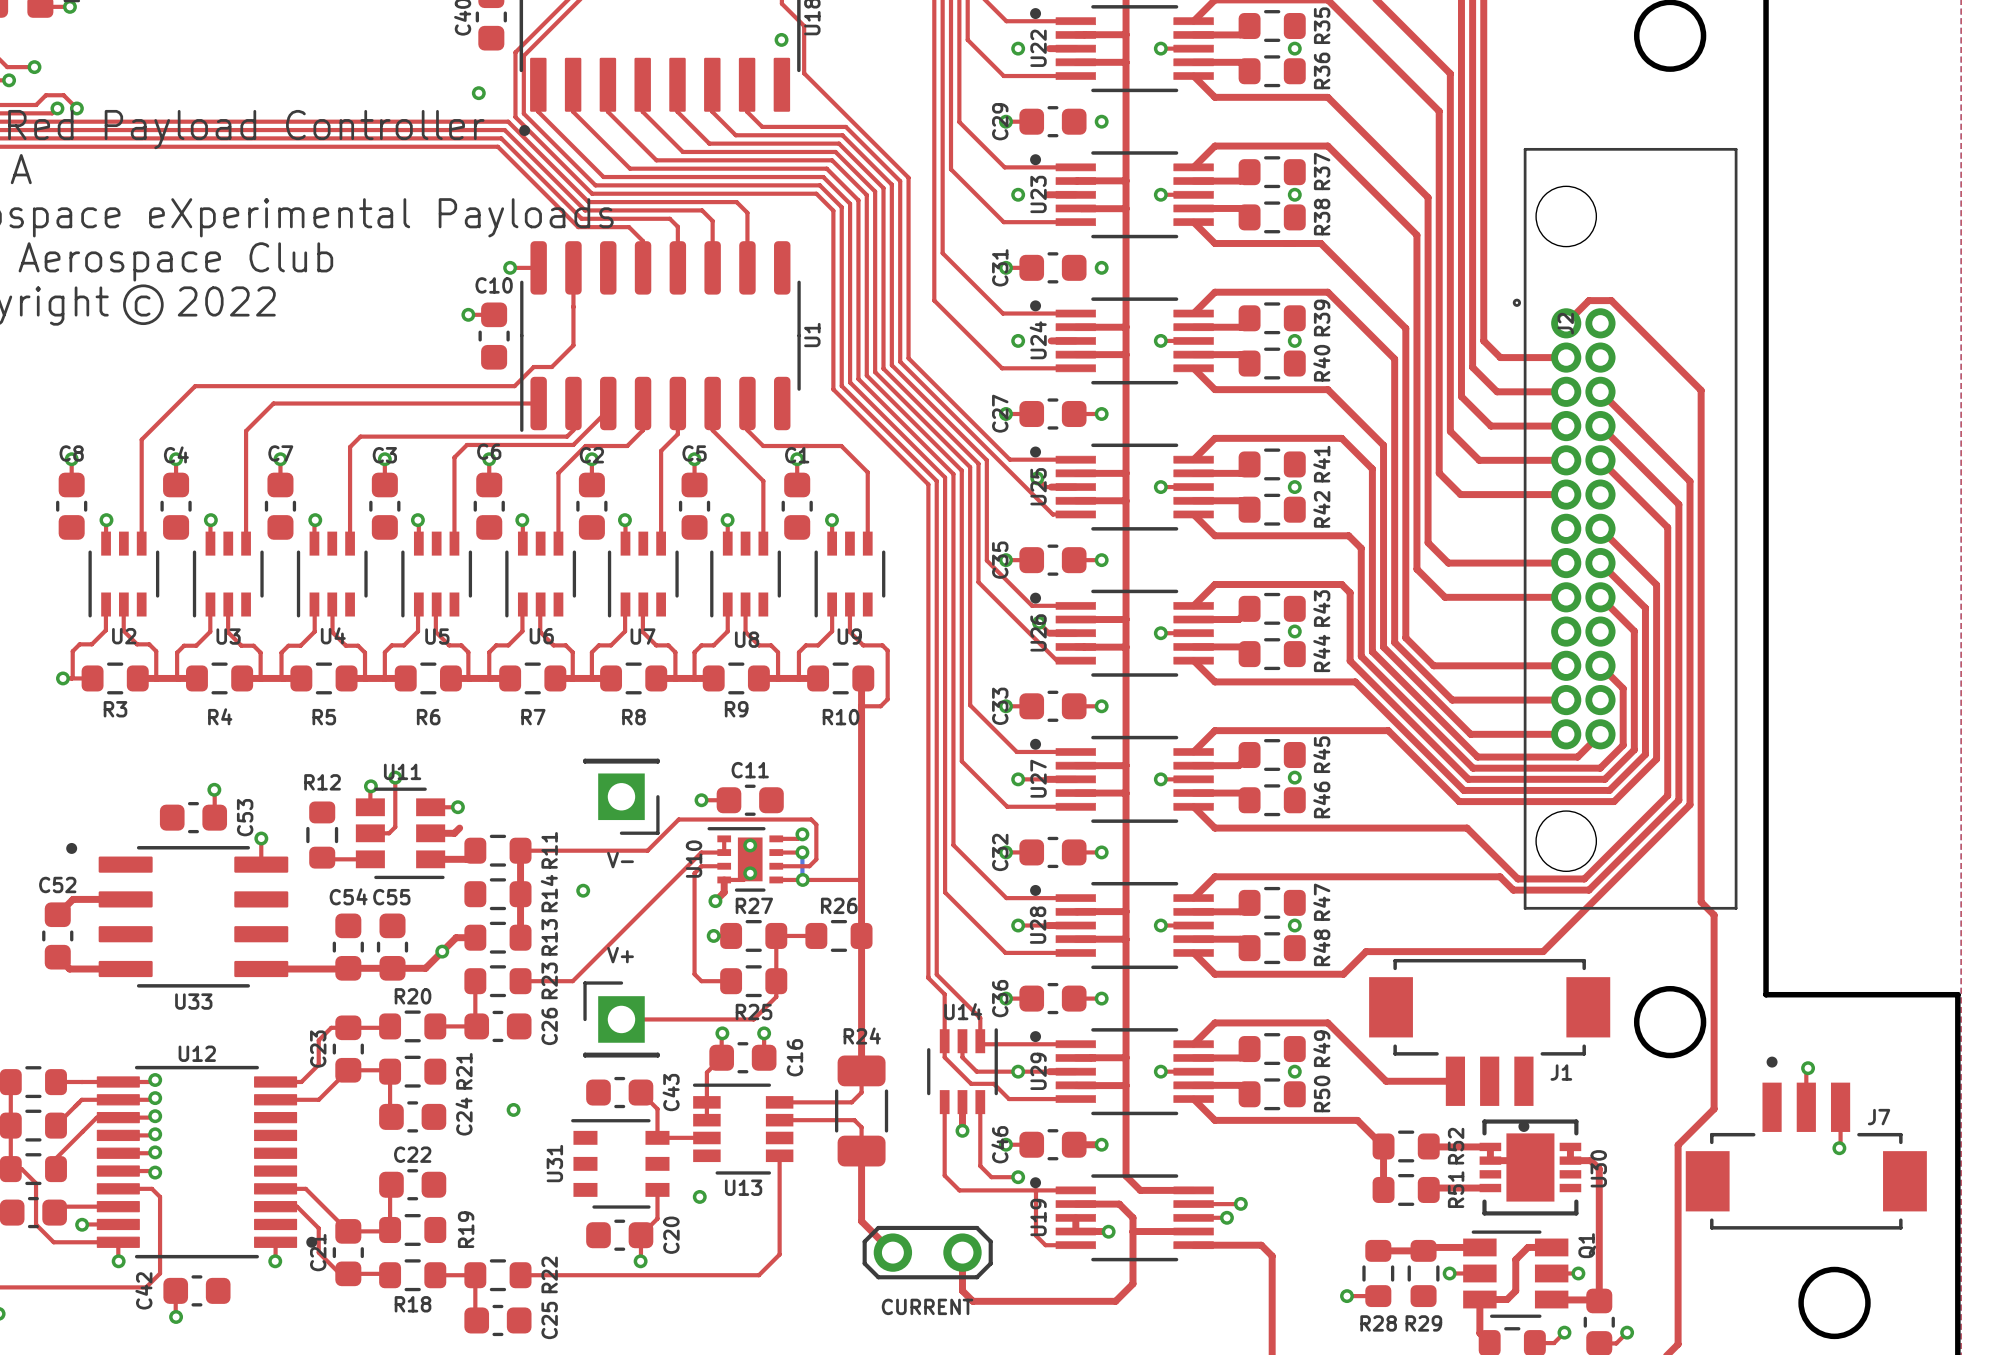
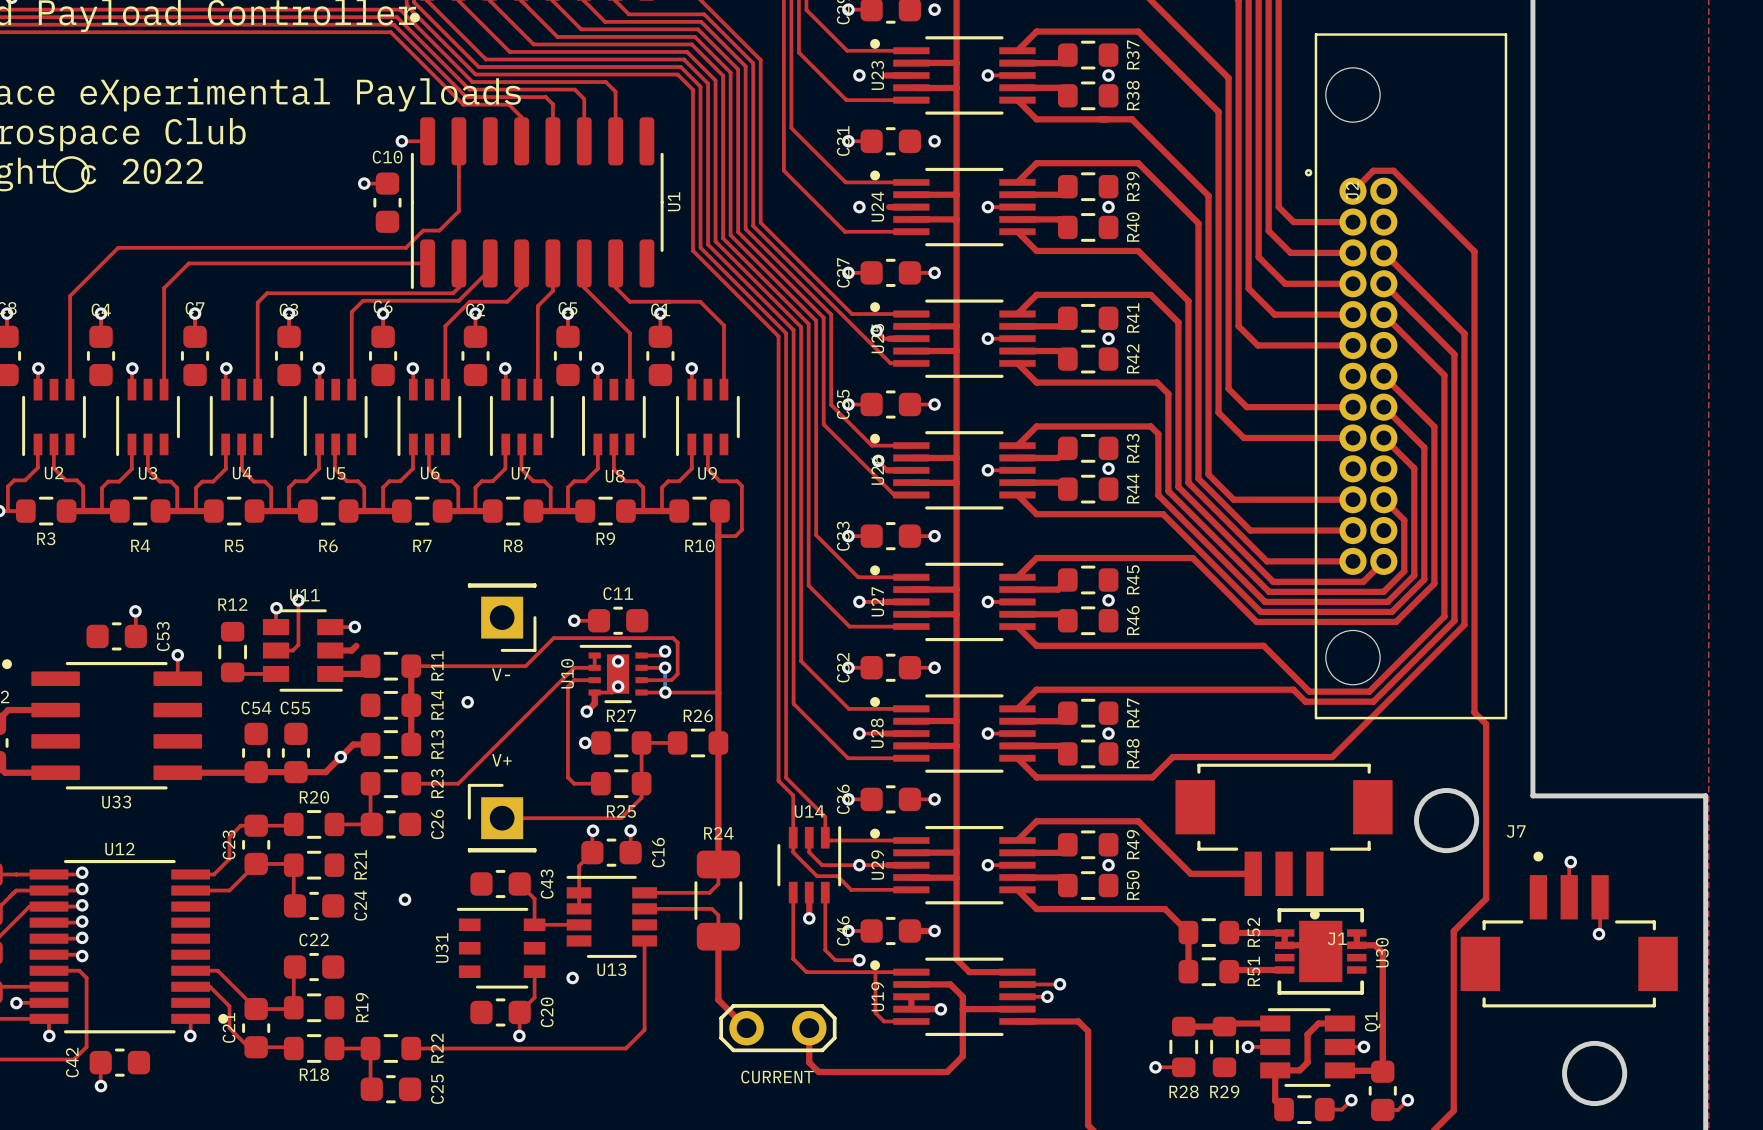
J1 name position: J1 (1561, 1072) -> J1 (1337, 938)
J7 name position: J7 (1879, 1117) -> J7 (1516, 831)

